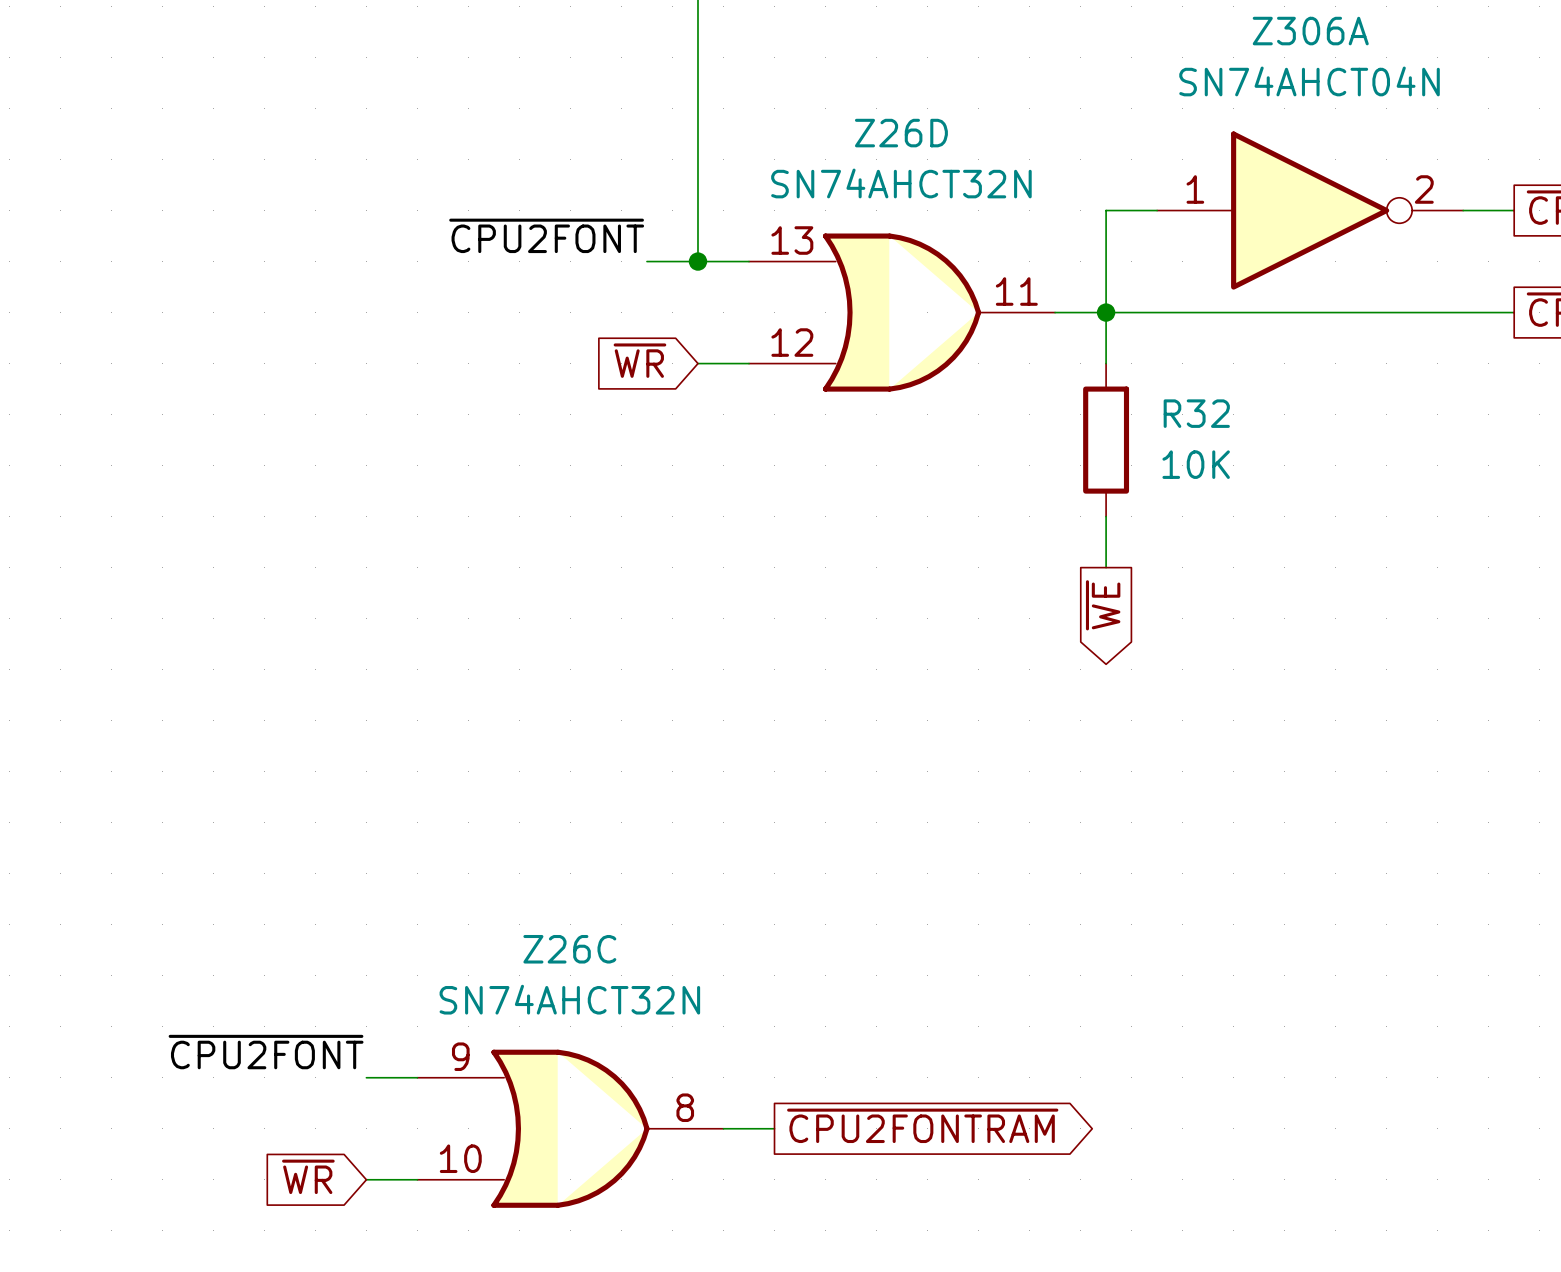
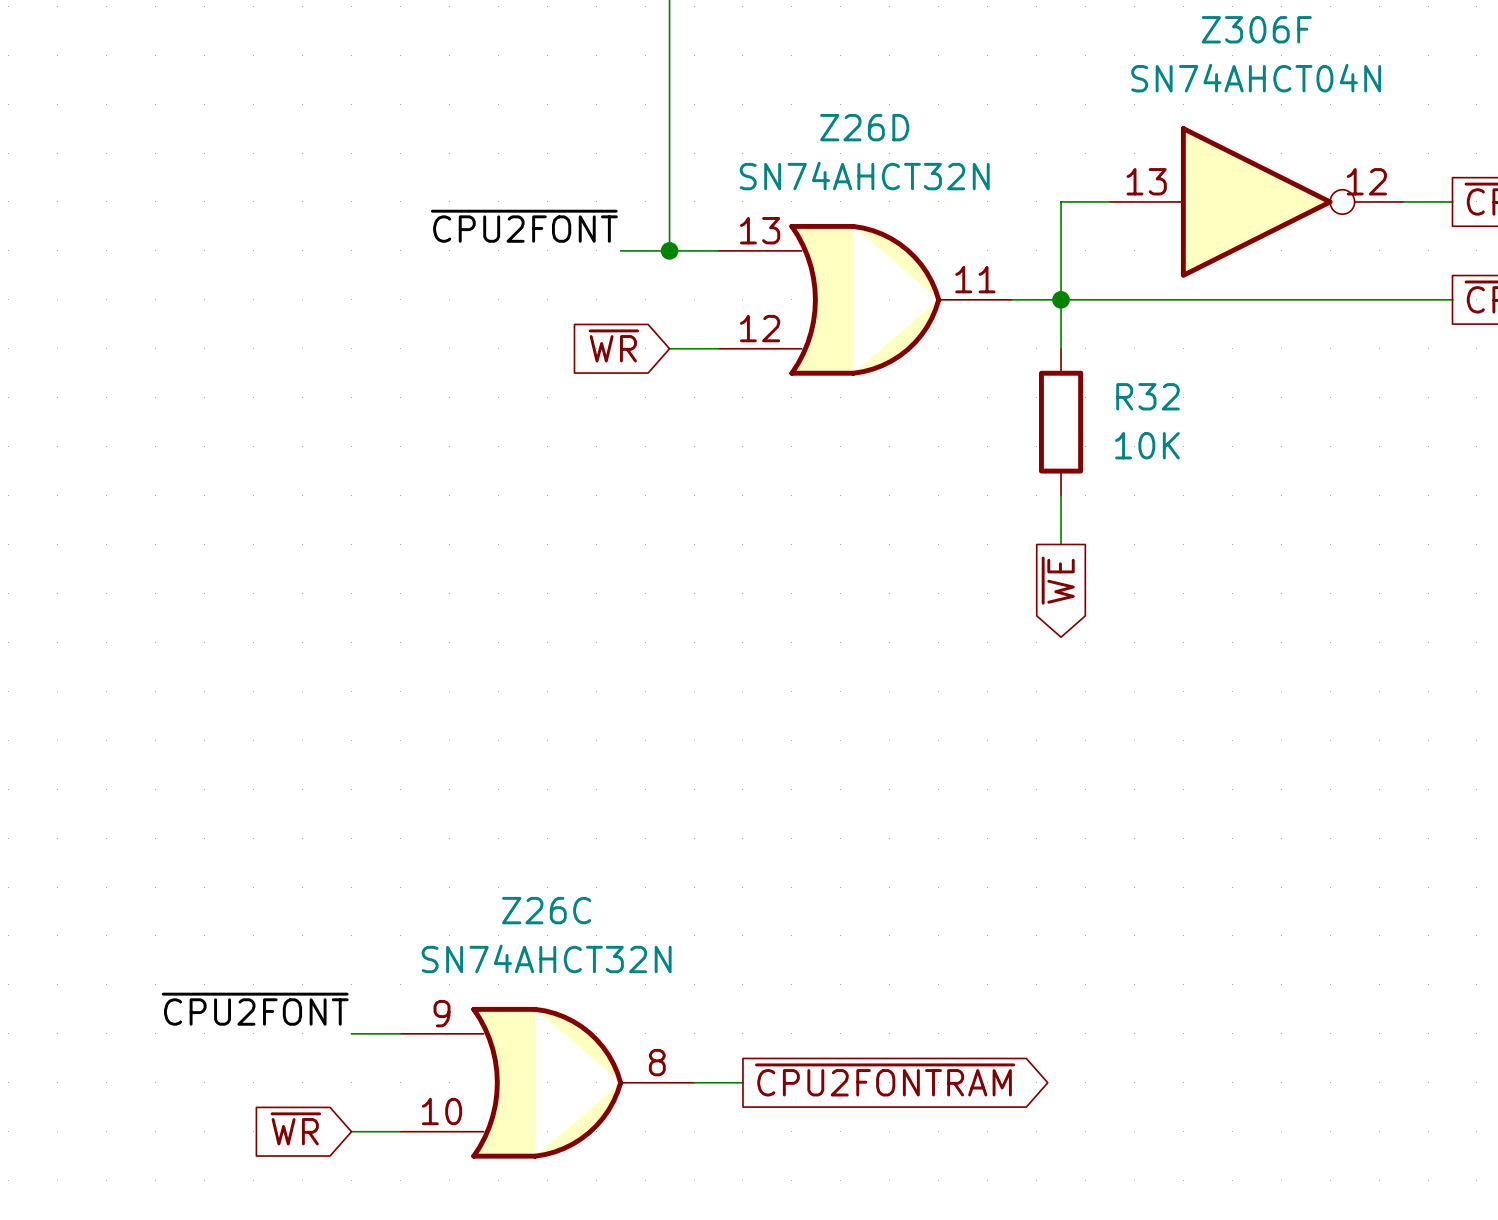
Z306A name: Z306A (1310, 31) -> Z306F (1256, 29)
Z306A pin number: 1 (1195, 189) -> 13 (1146, 181)
Z306A pin number: 2 (1424, 189) -> 12 (1366, 181)

